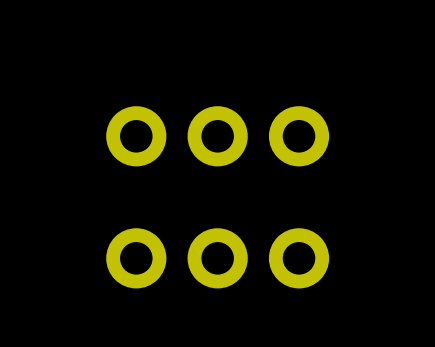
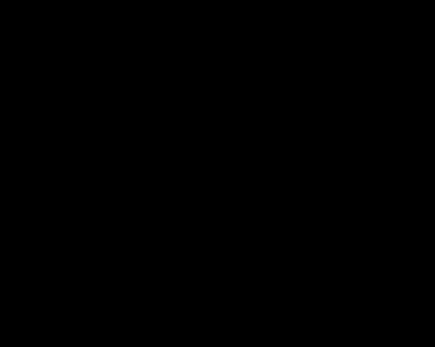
part: (217, 136) -> none
part: (217, 258) -> none

